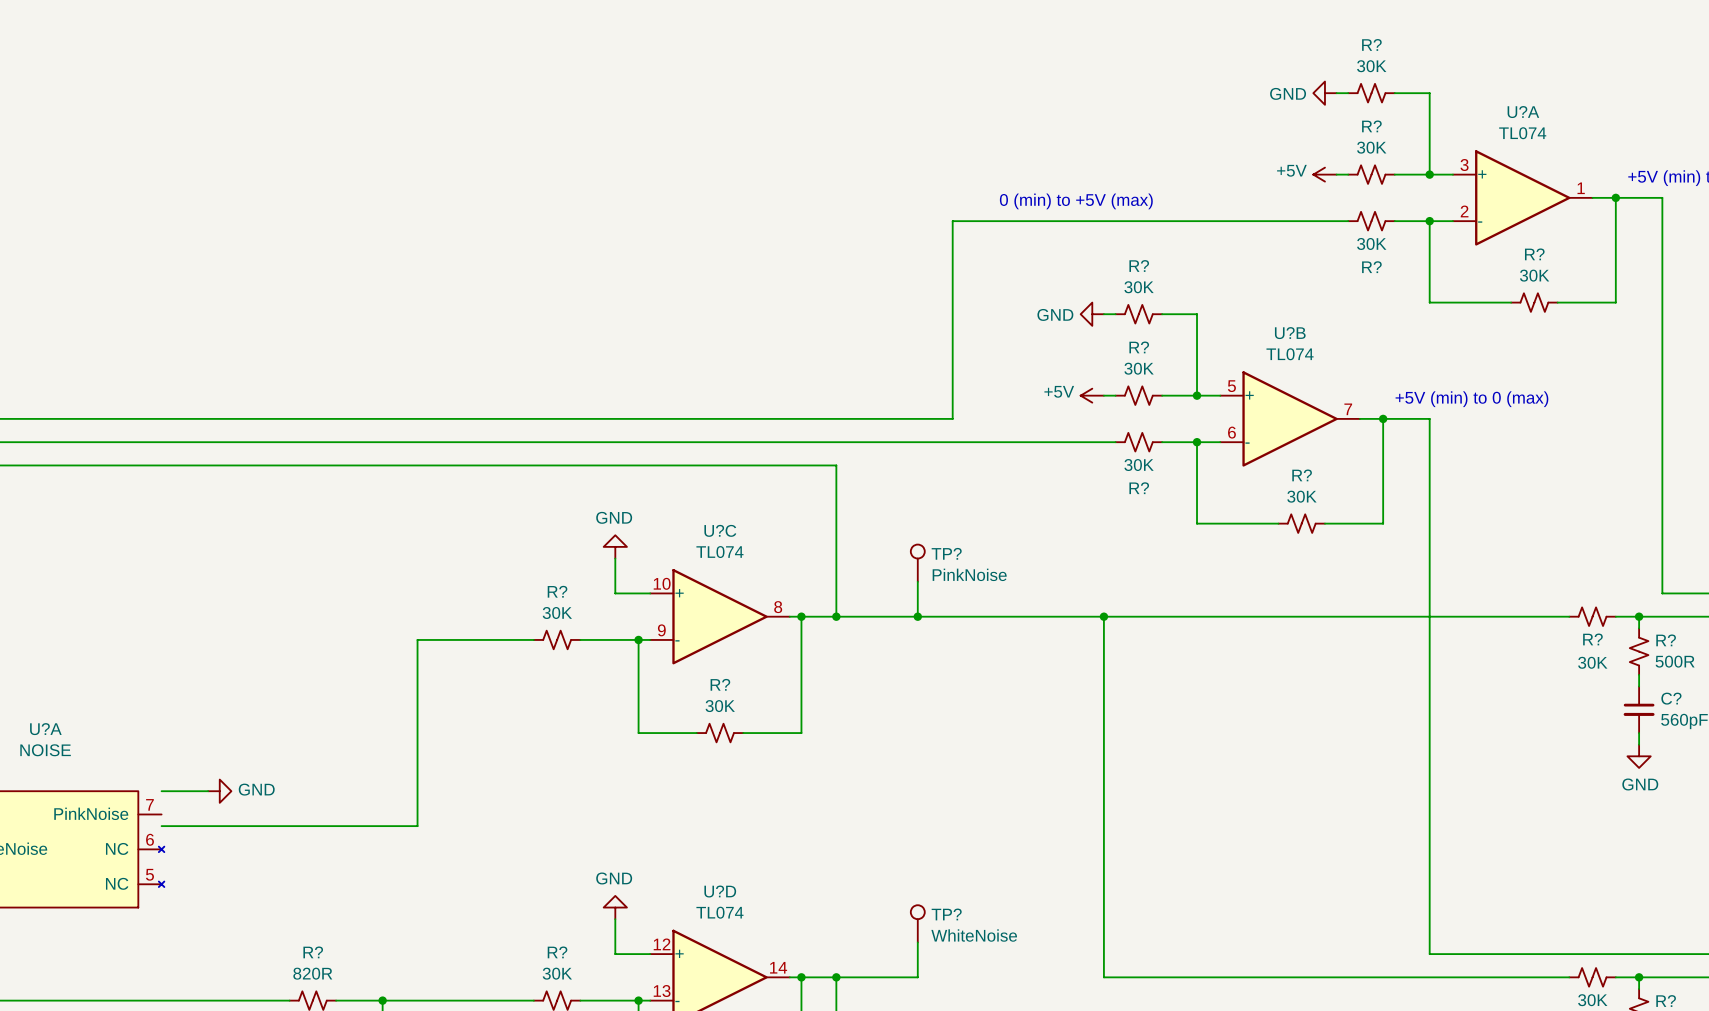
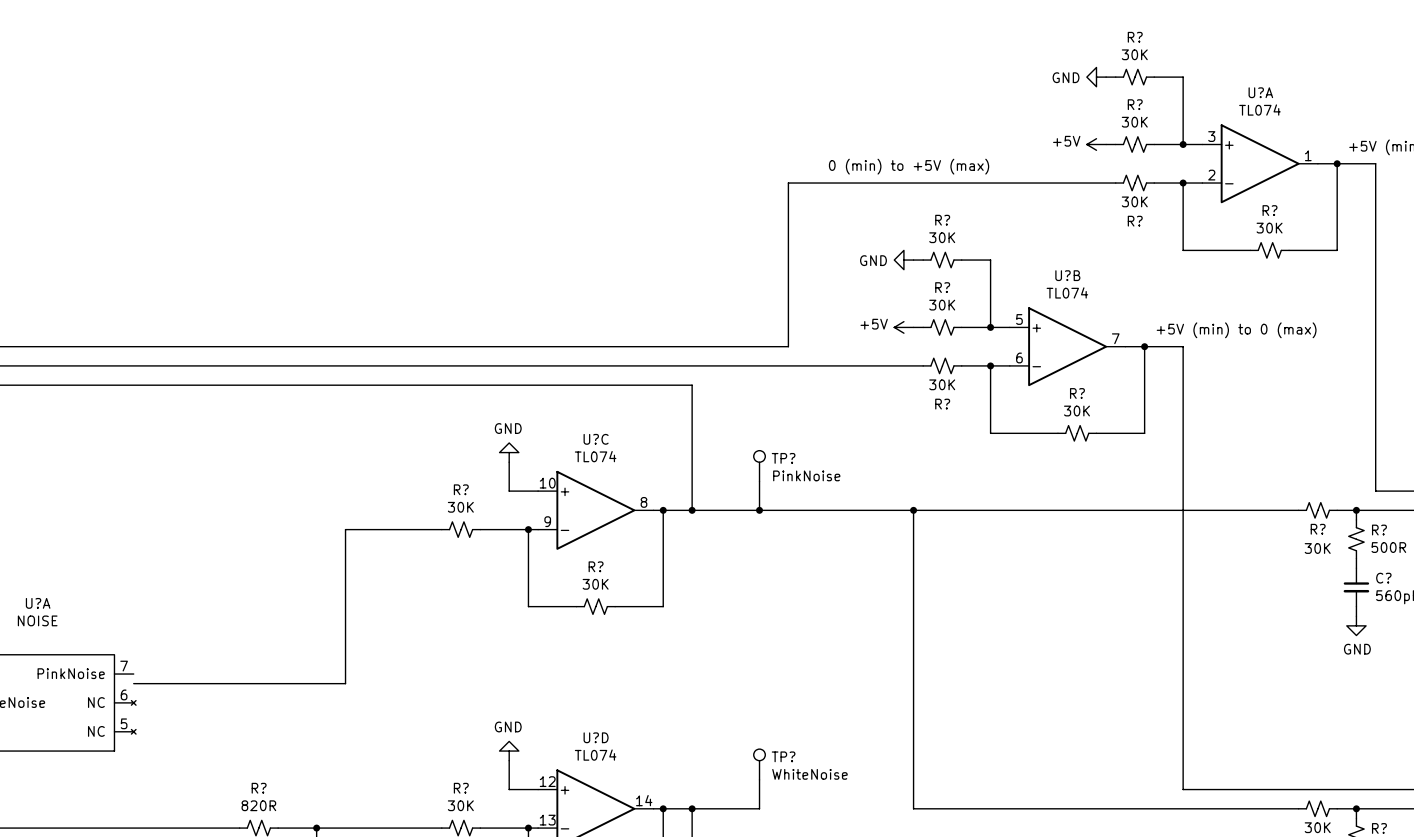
wire: (161, 791) (208, 791) -> none
power symbol: GND (219, 791) -> none

